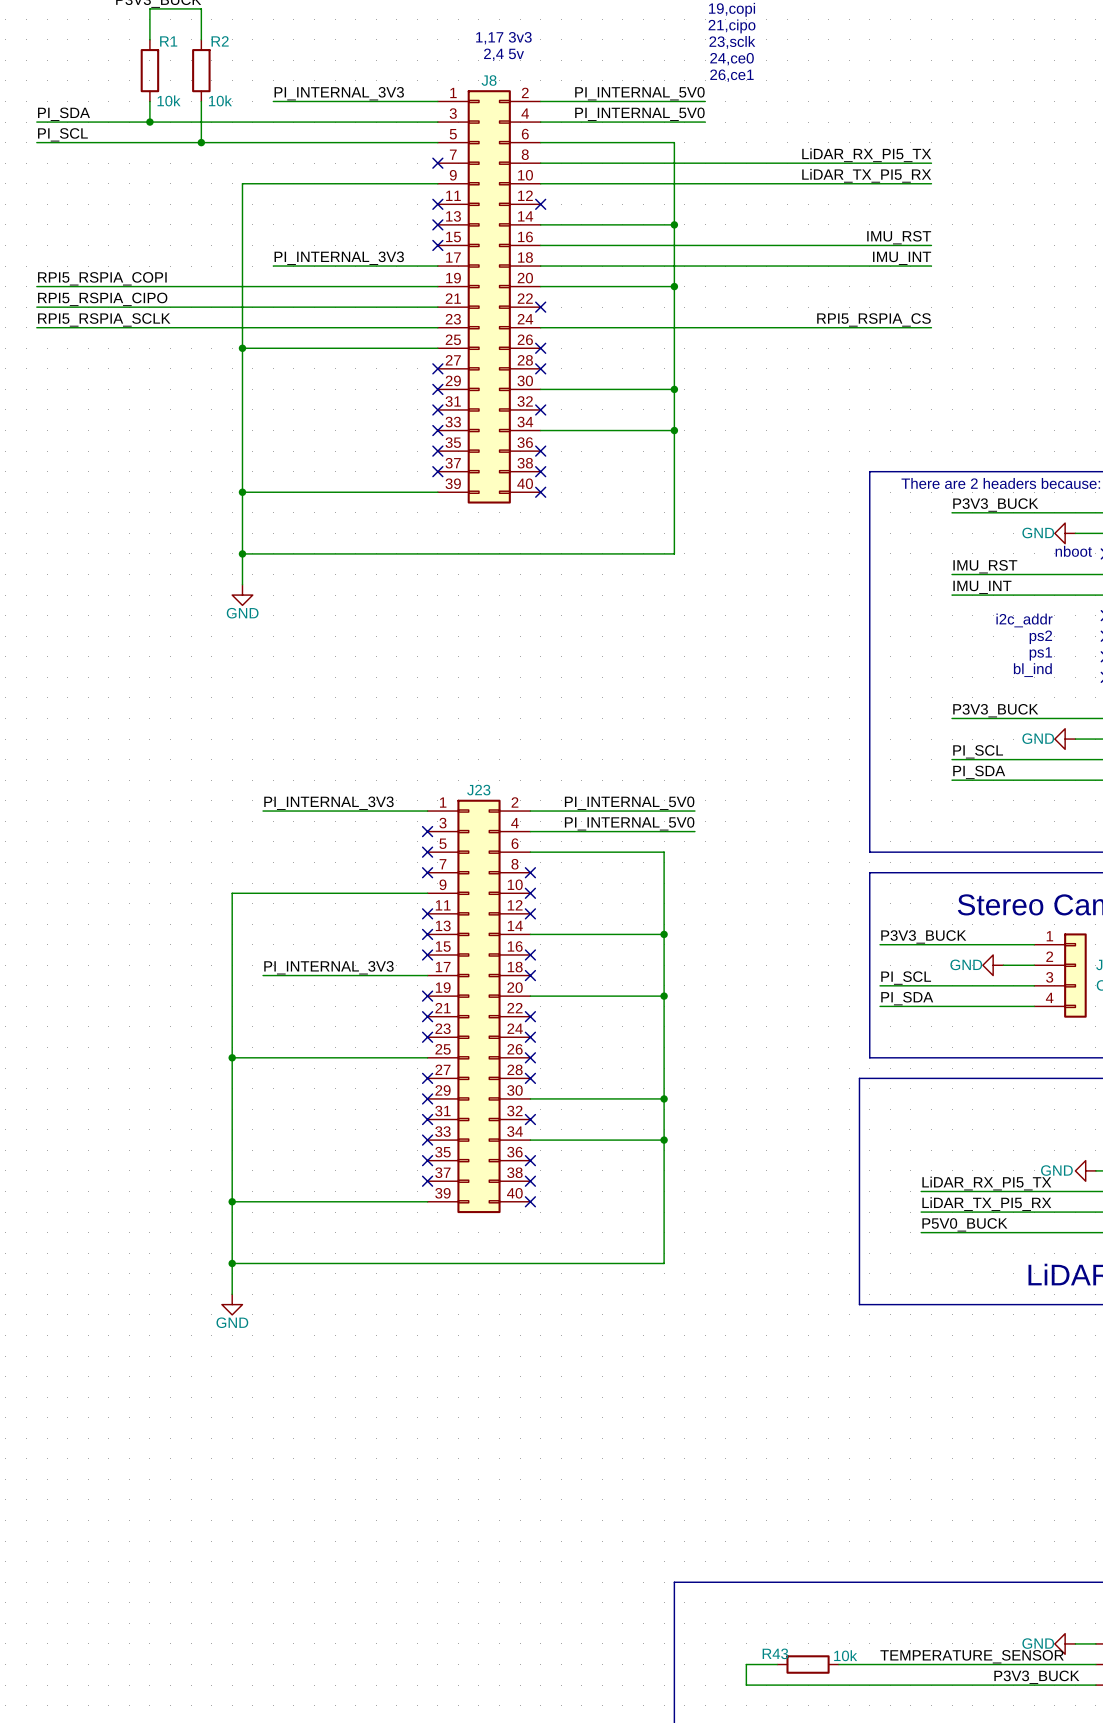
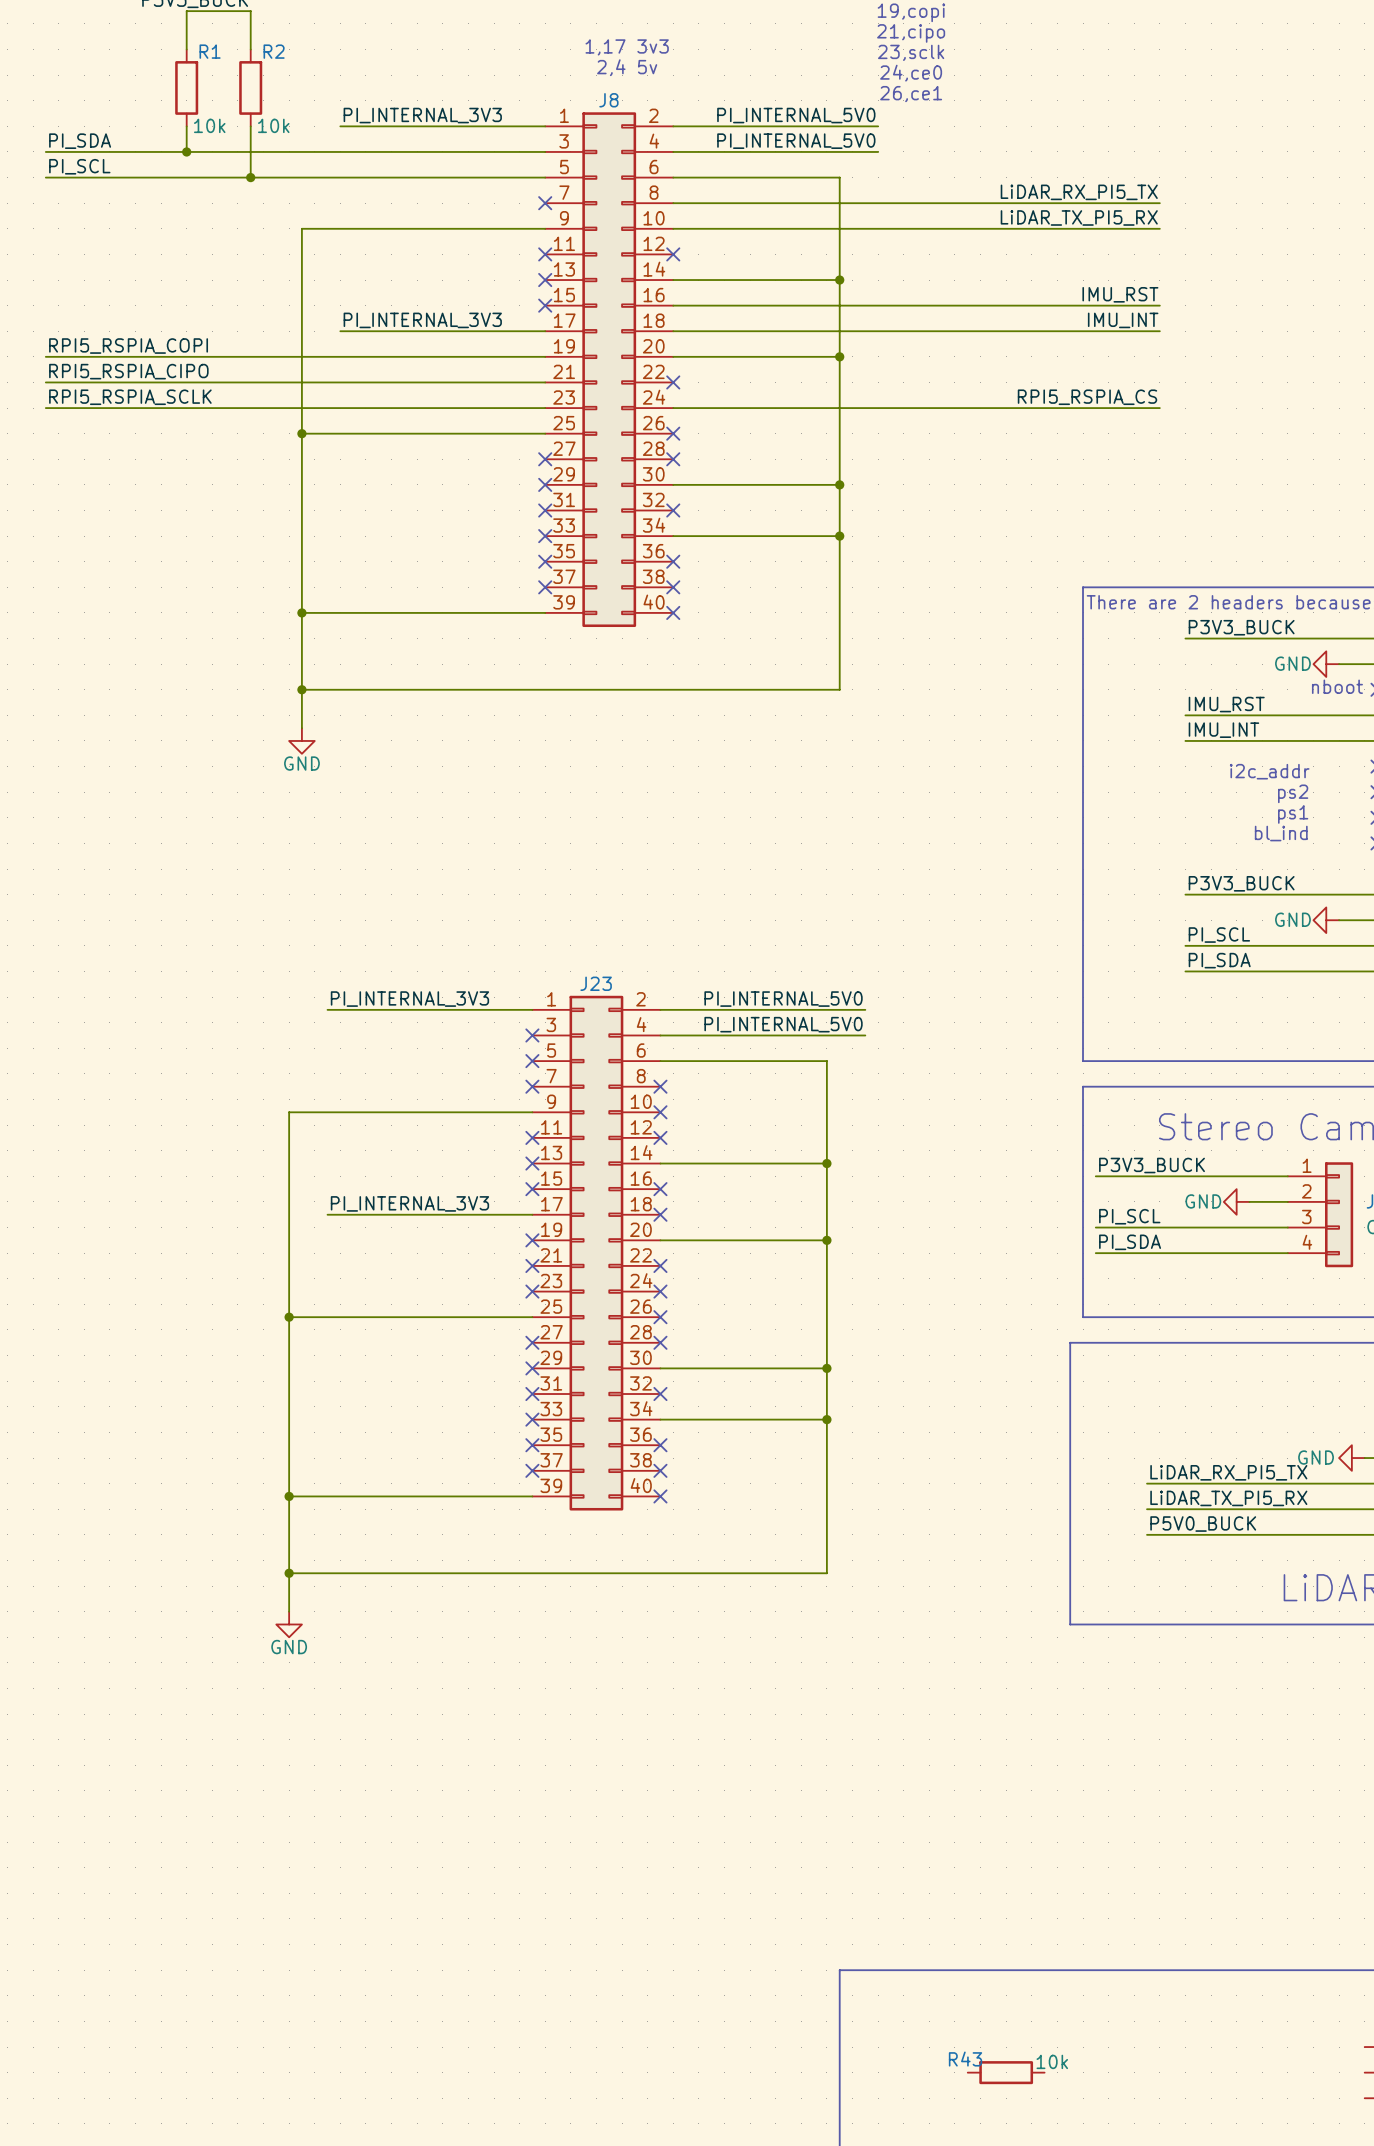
power symbol: GND (1065, 1643) -> none
wire: (1075, 1643) (1095, 1643) -> none
label: TEMPERATURE_SENSOR (972, 1656) -> none
wire: (777, 1664) (746, 1664) (746, 1685) (1095, 1685) -> none
wire: (838, 1664) (1095, 1664) -> none
label: P3V3_BUCK (1036, 1677) -> none

